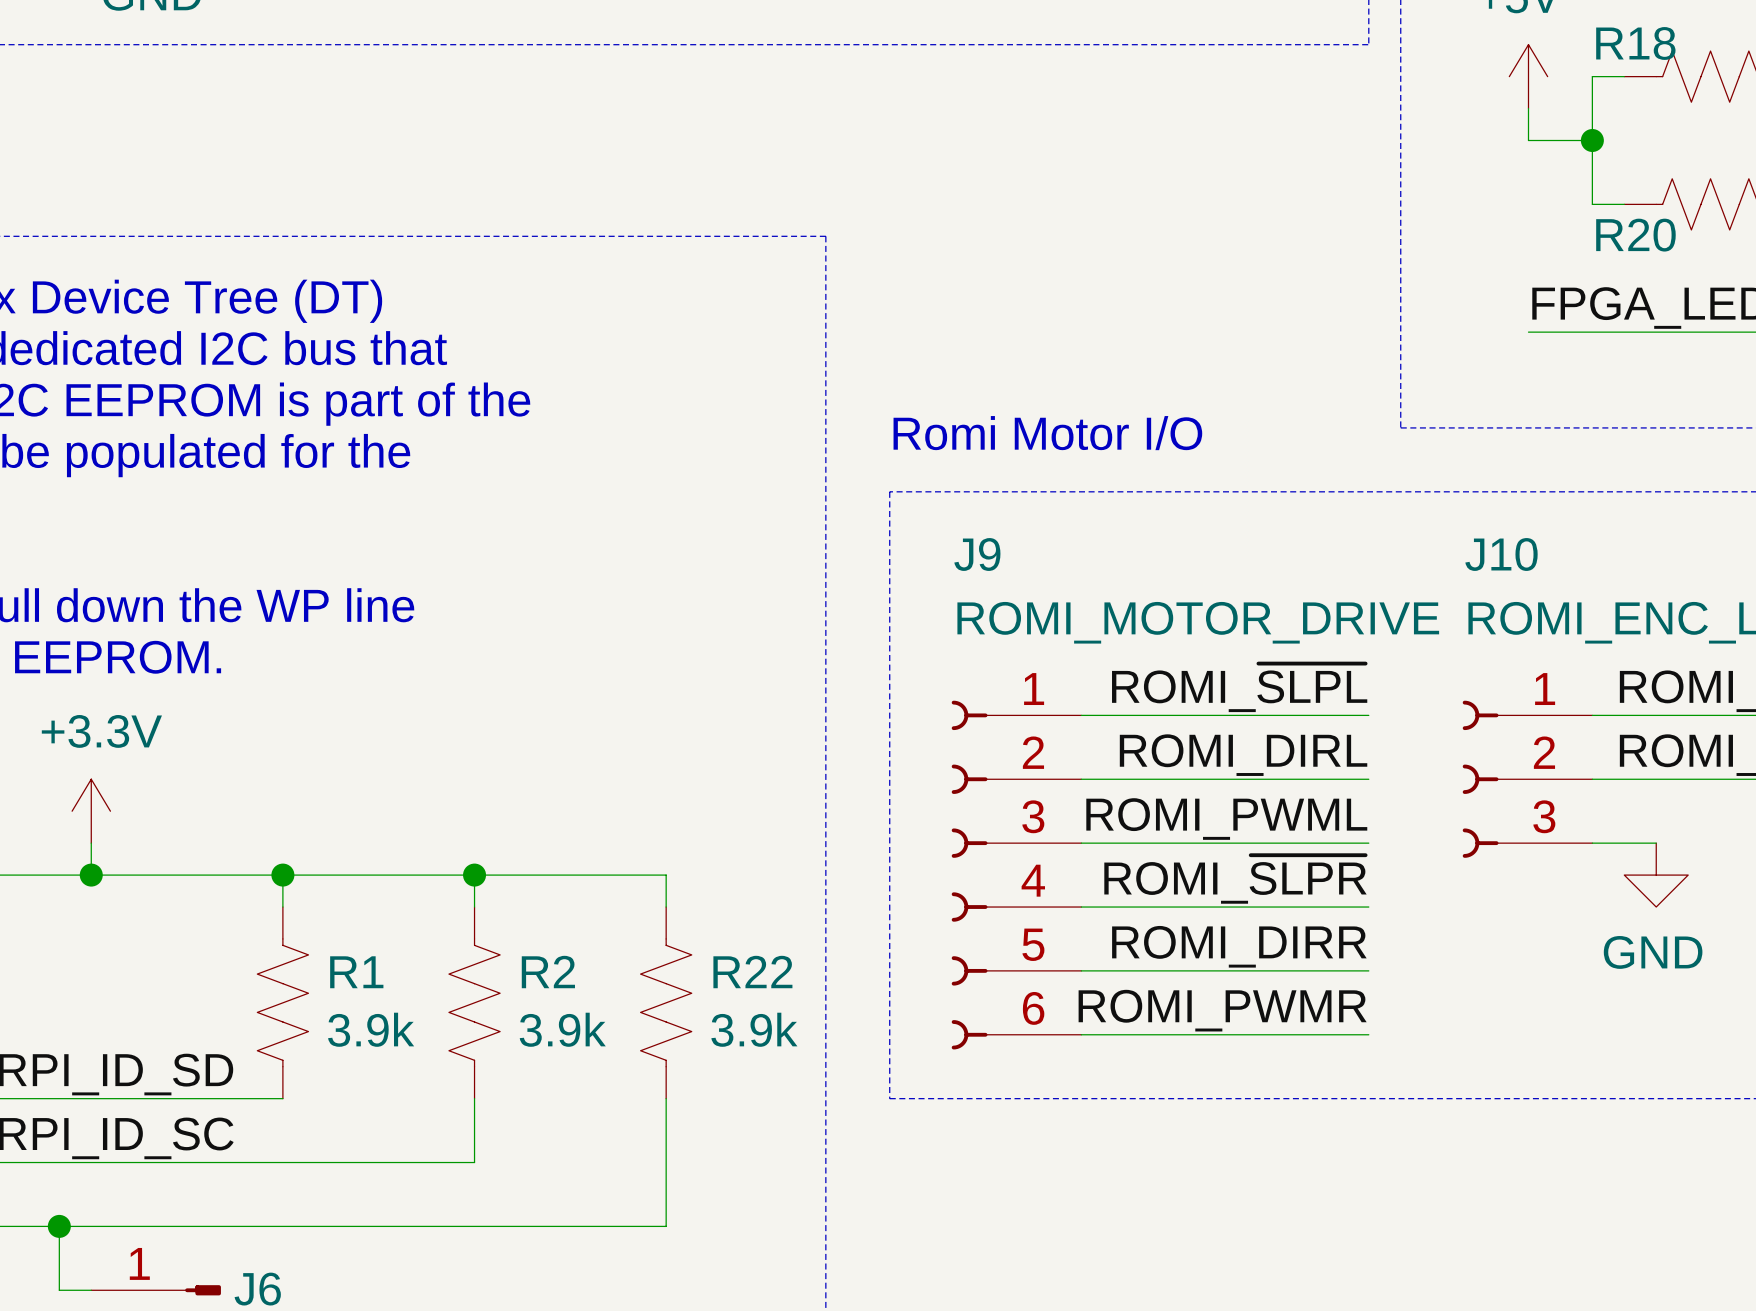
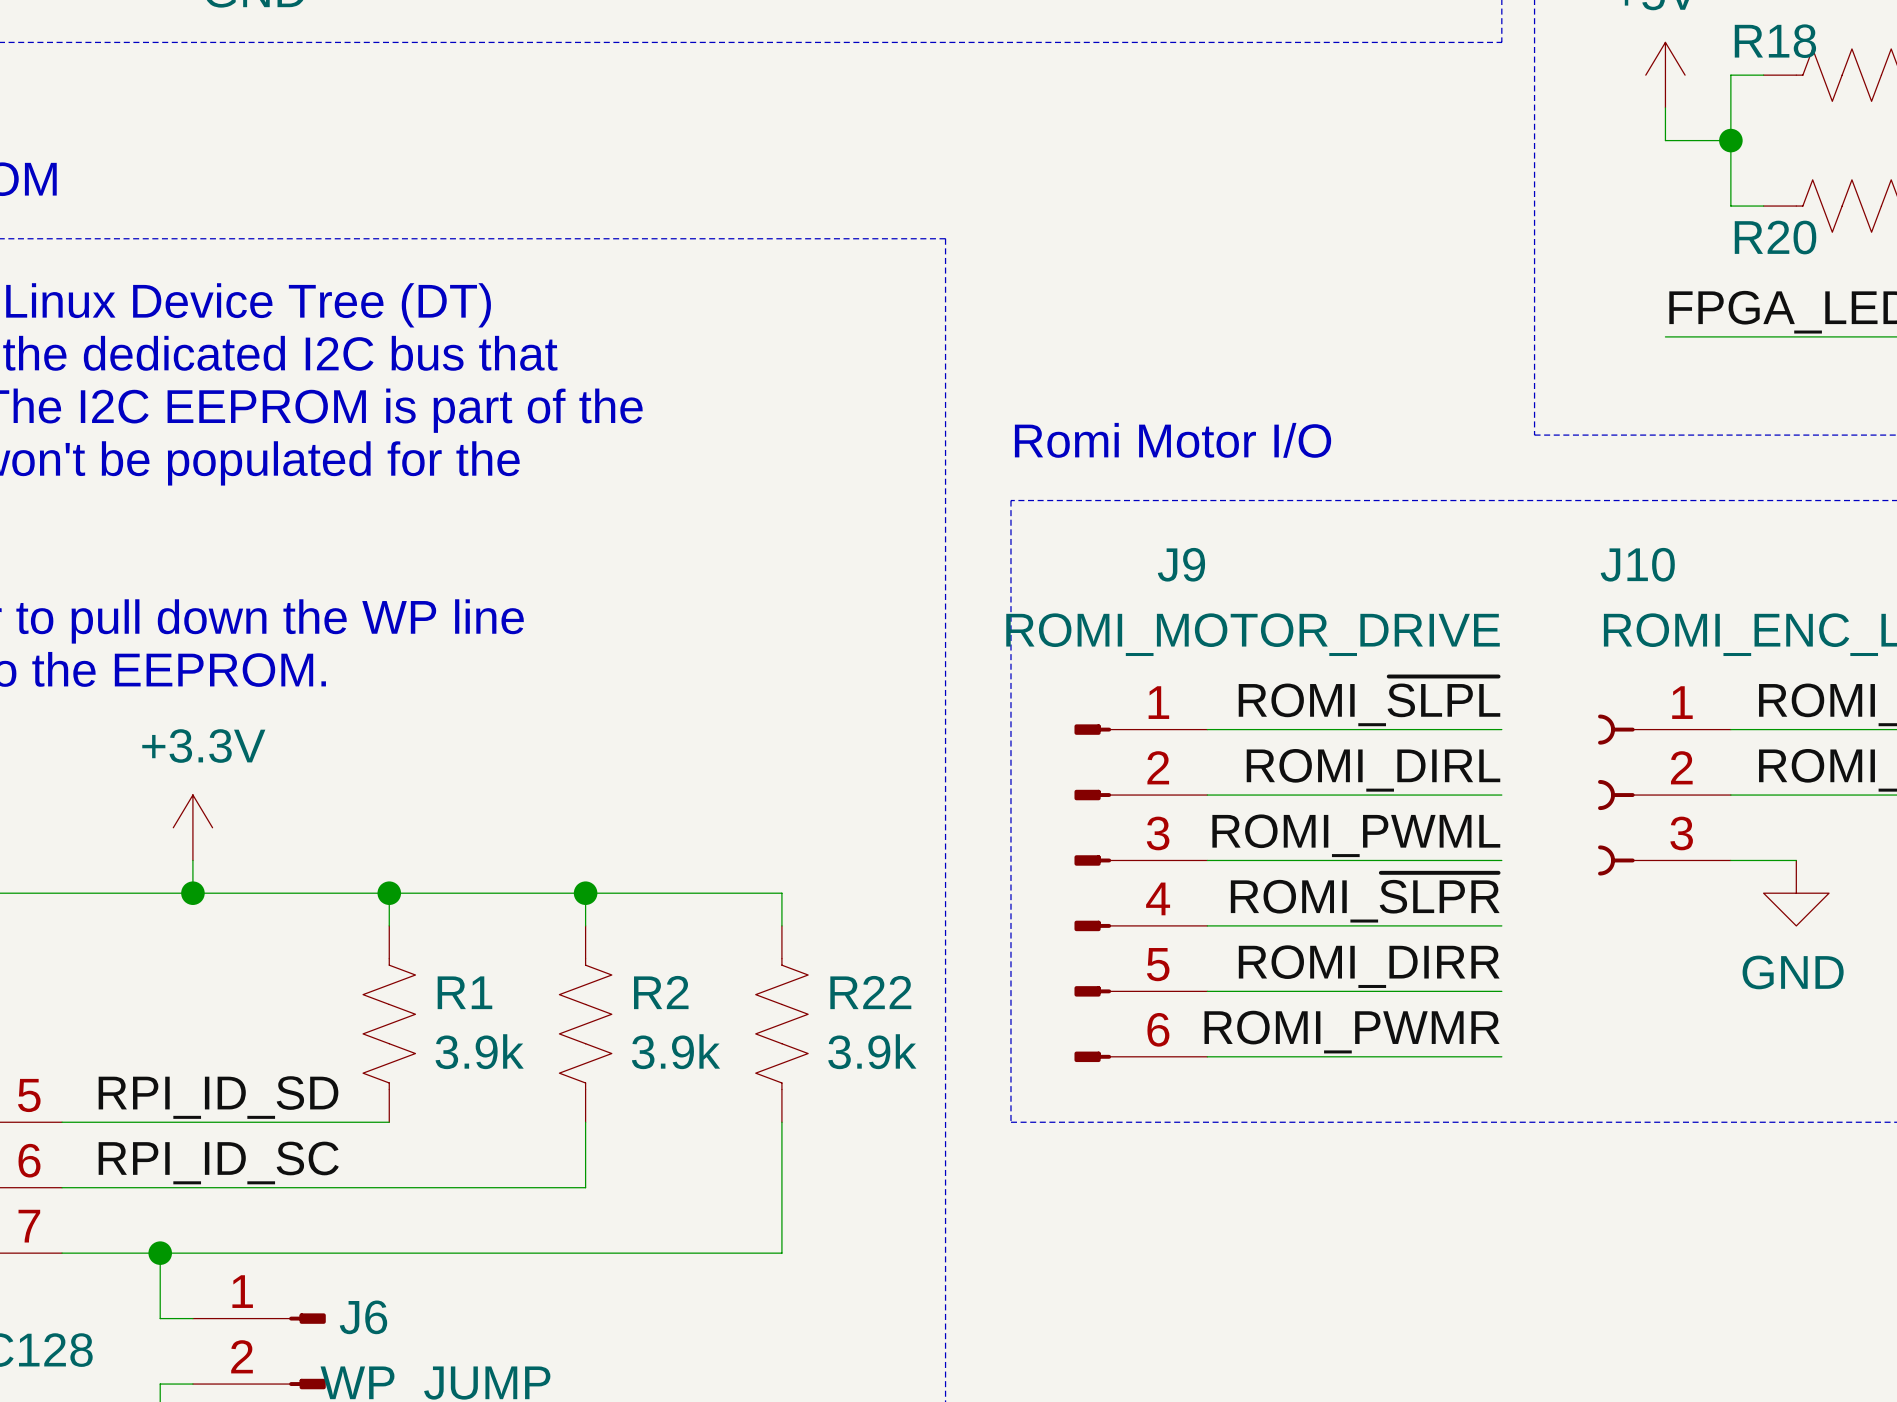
J9 name position: J9 (977, 554) -> J9 (1181, 564)
J9 value position: ROMI_MOTOR_DRIVE (1198, 622) -> ROMI_MOTOR_DRIVE (1253, 634)
J9 symbol: [951, 700, 1082, 1050] -> [1074, 724, 1208, 1063]

